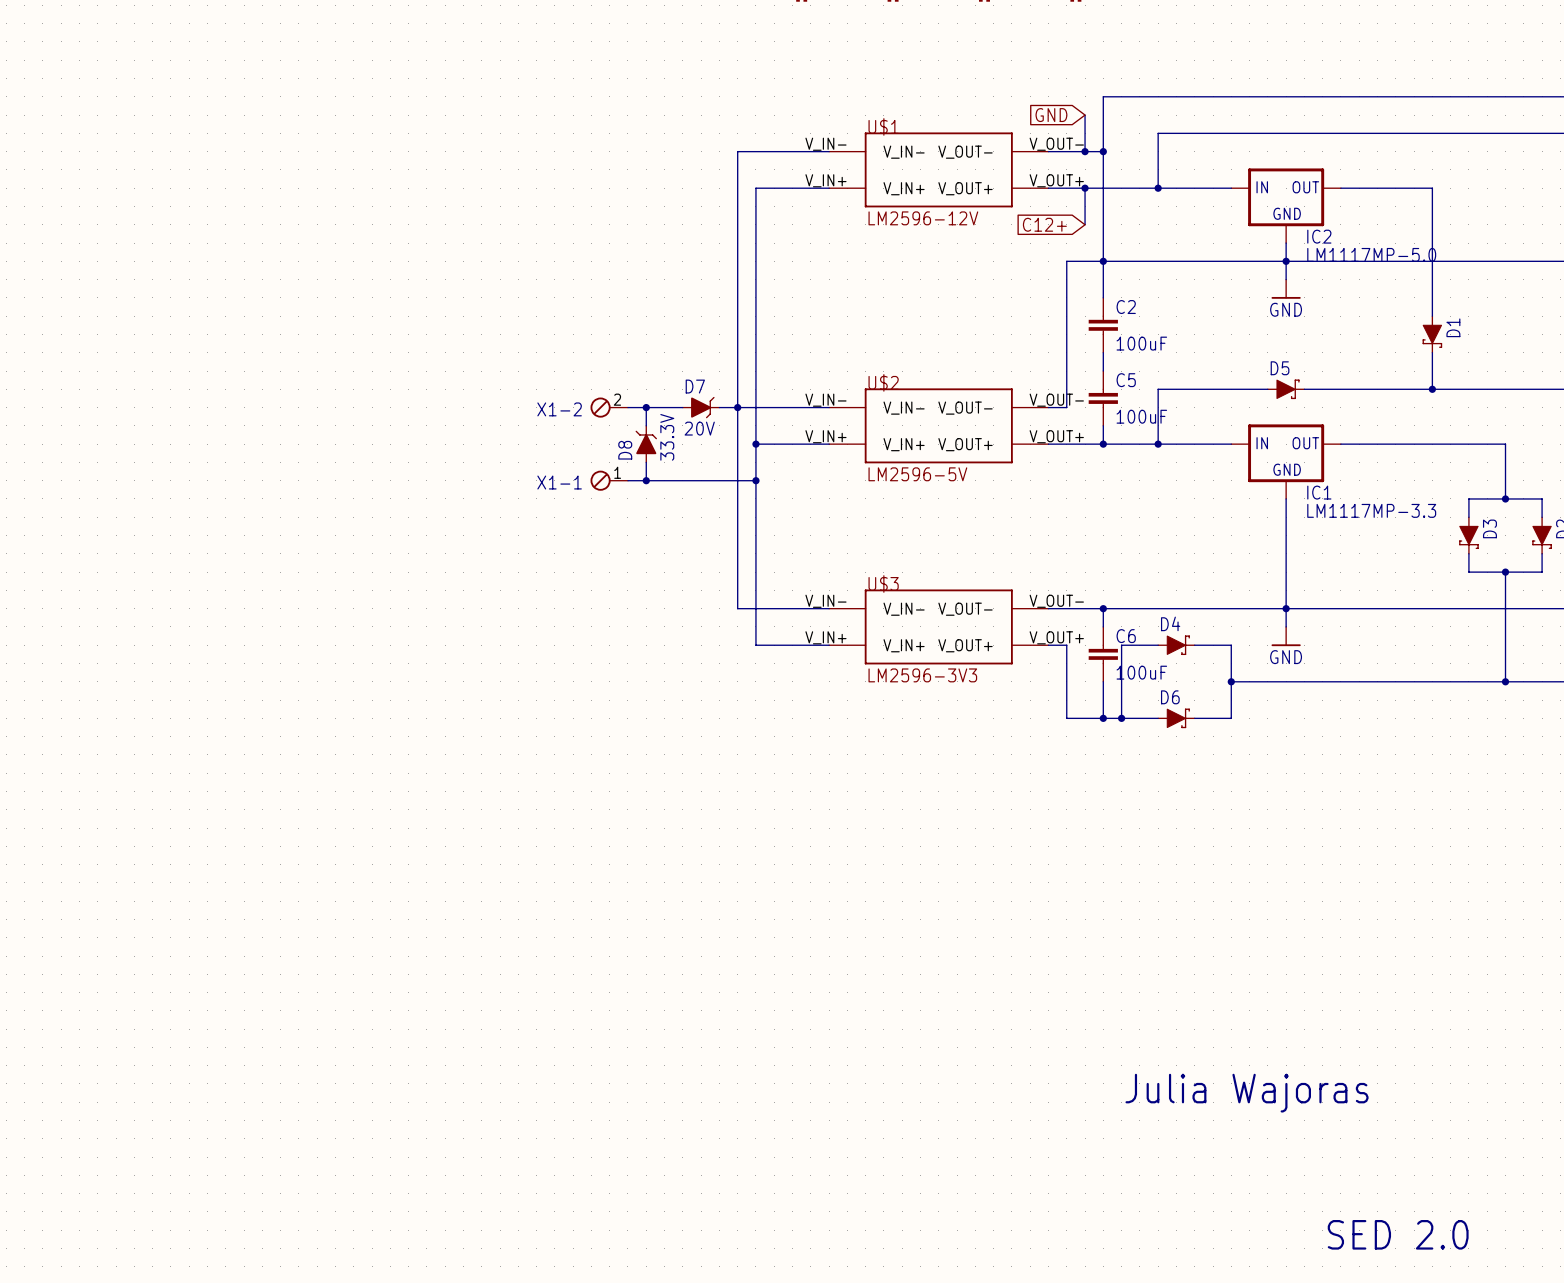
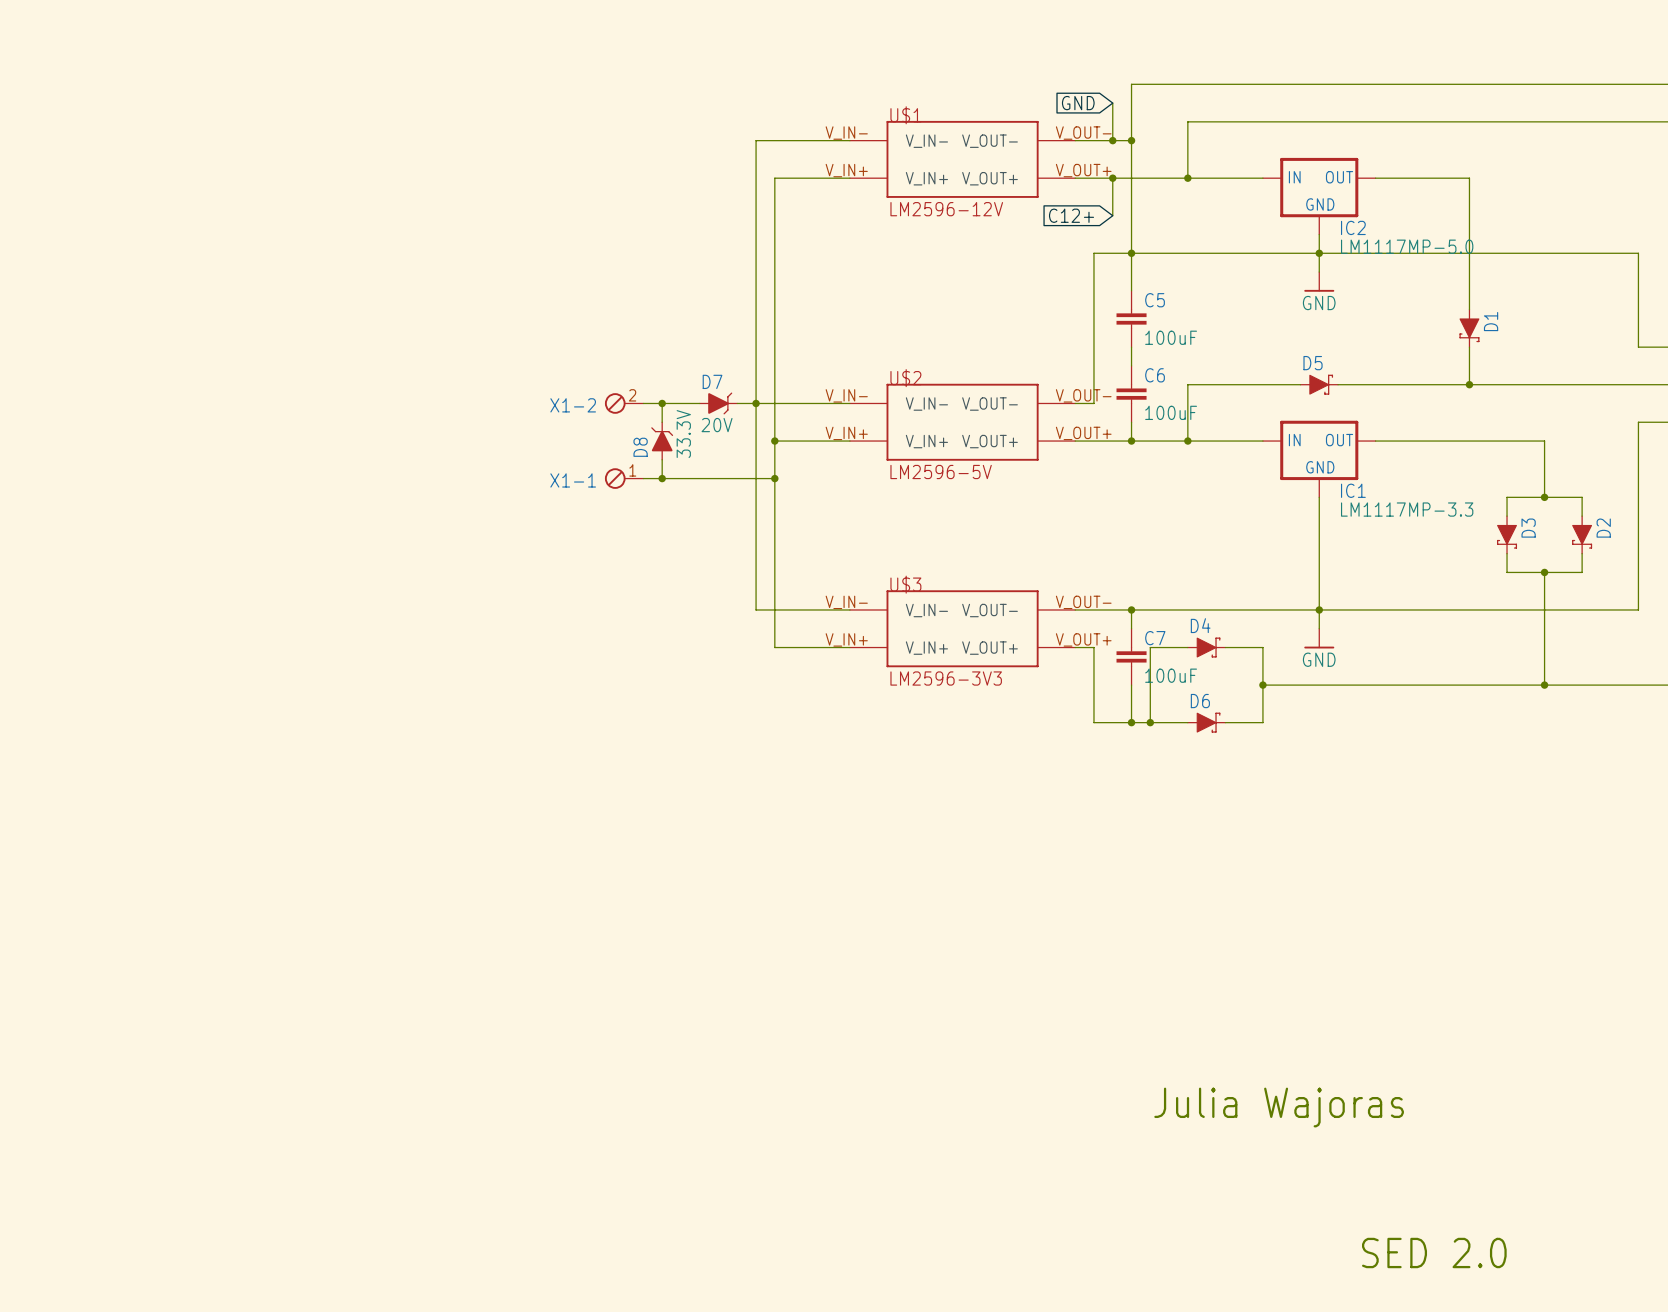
C2 name: C2 (1126, 307) -> C5 (1155, 300)
C5 name: C5 (1126, 380) -> C6 (1155, 375)
C6 name: C6 (1126, 636) -> C7 (1155, 638)

